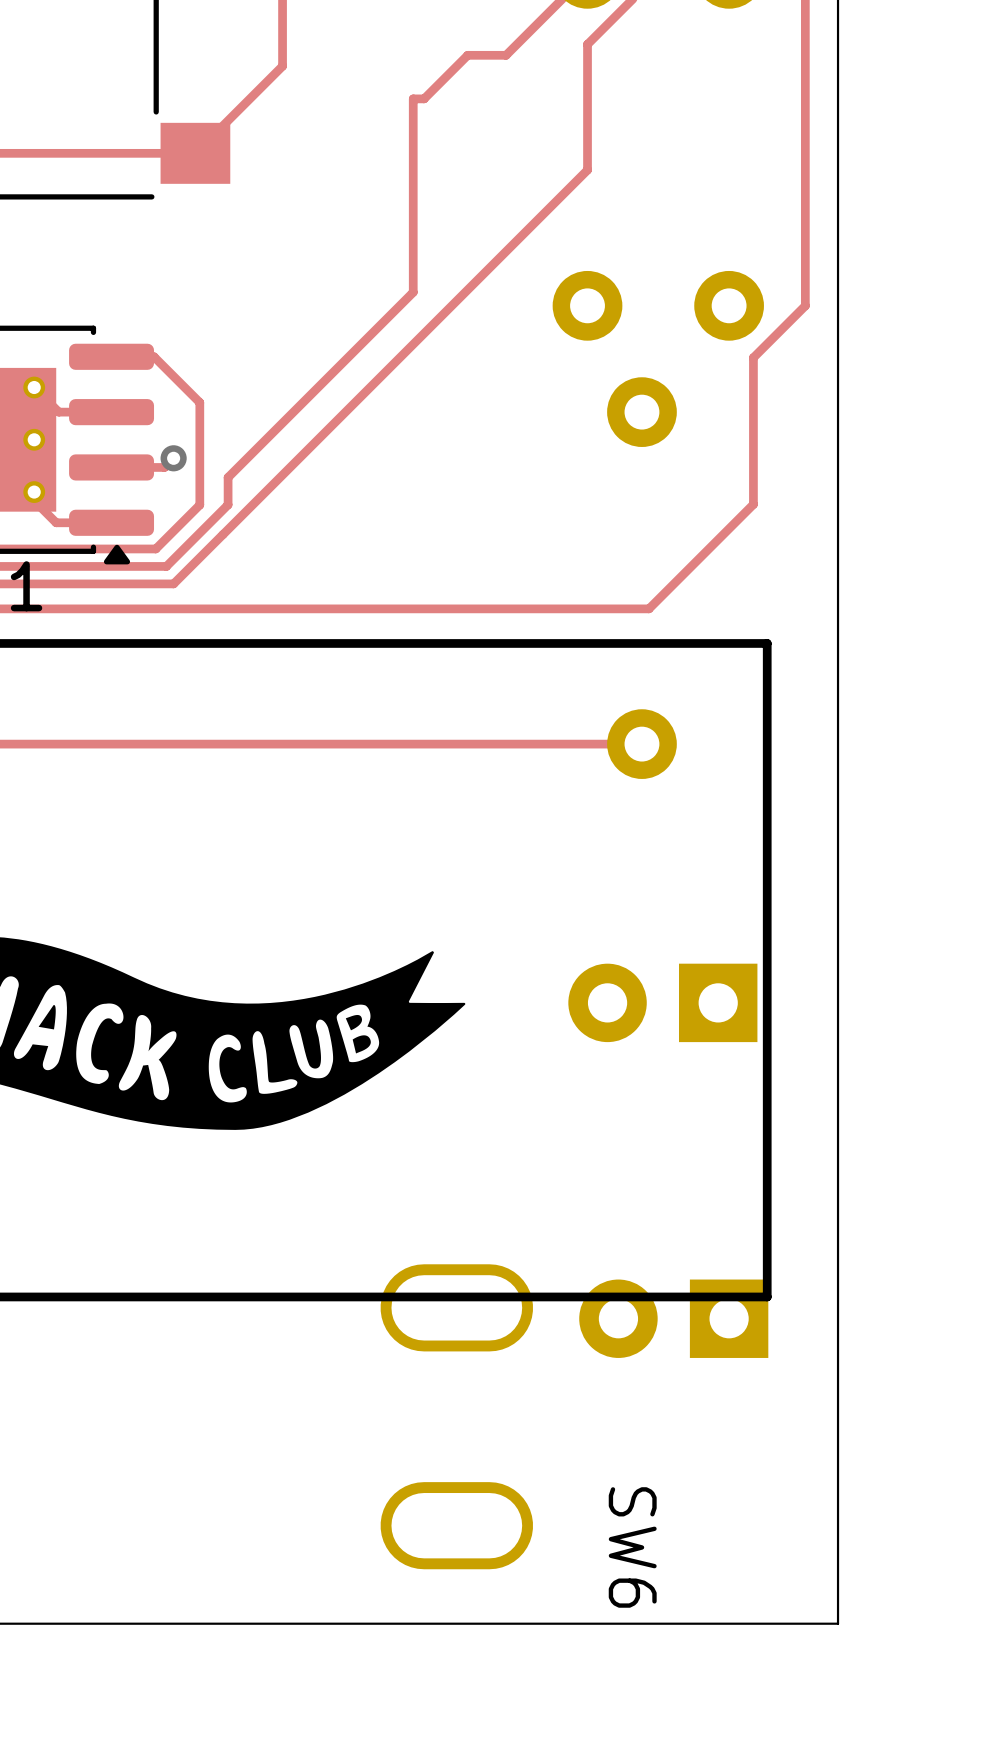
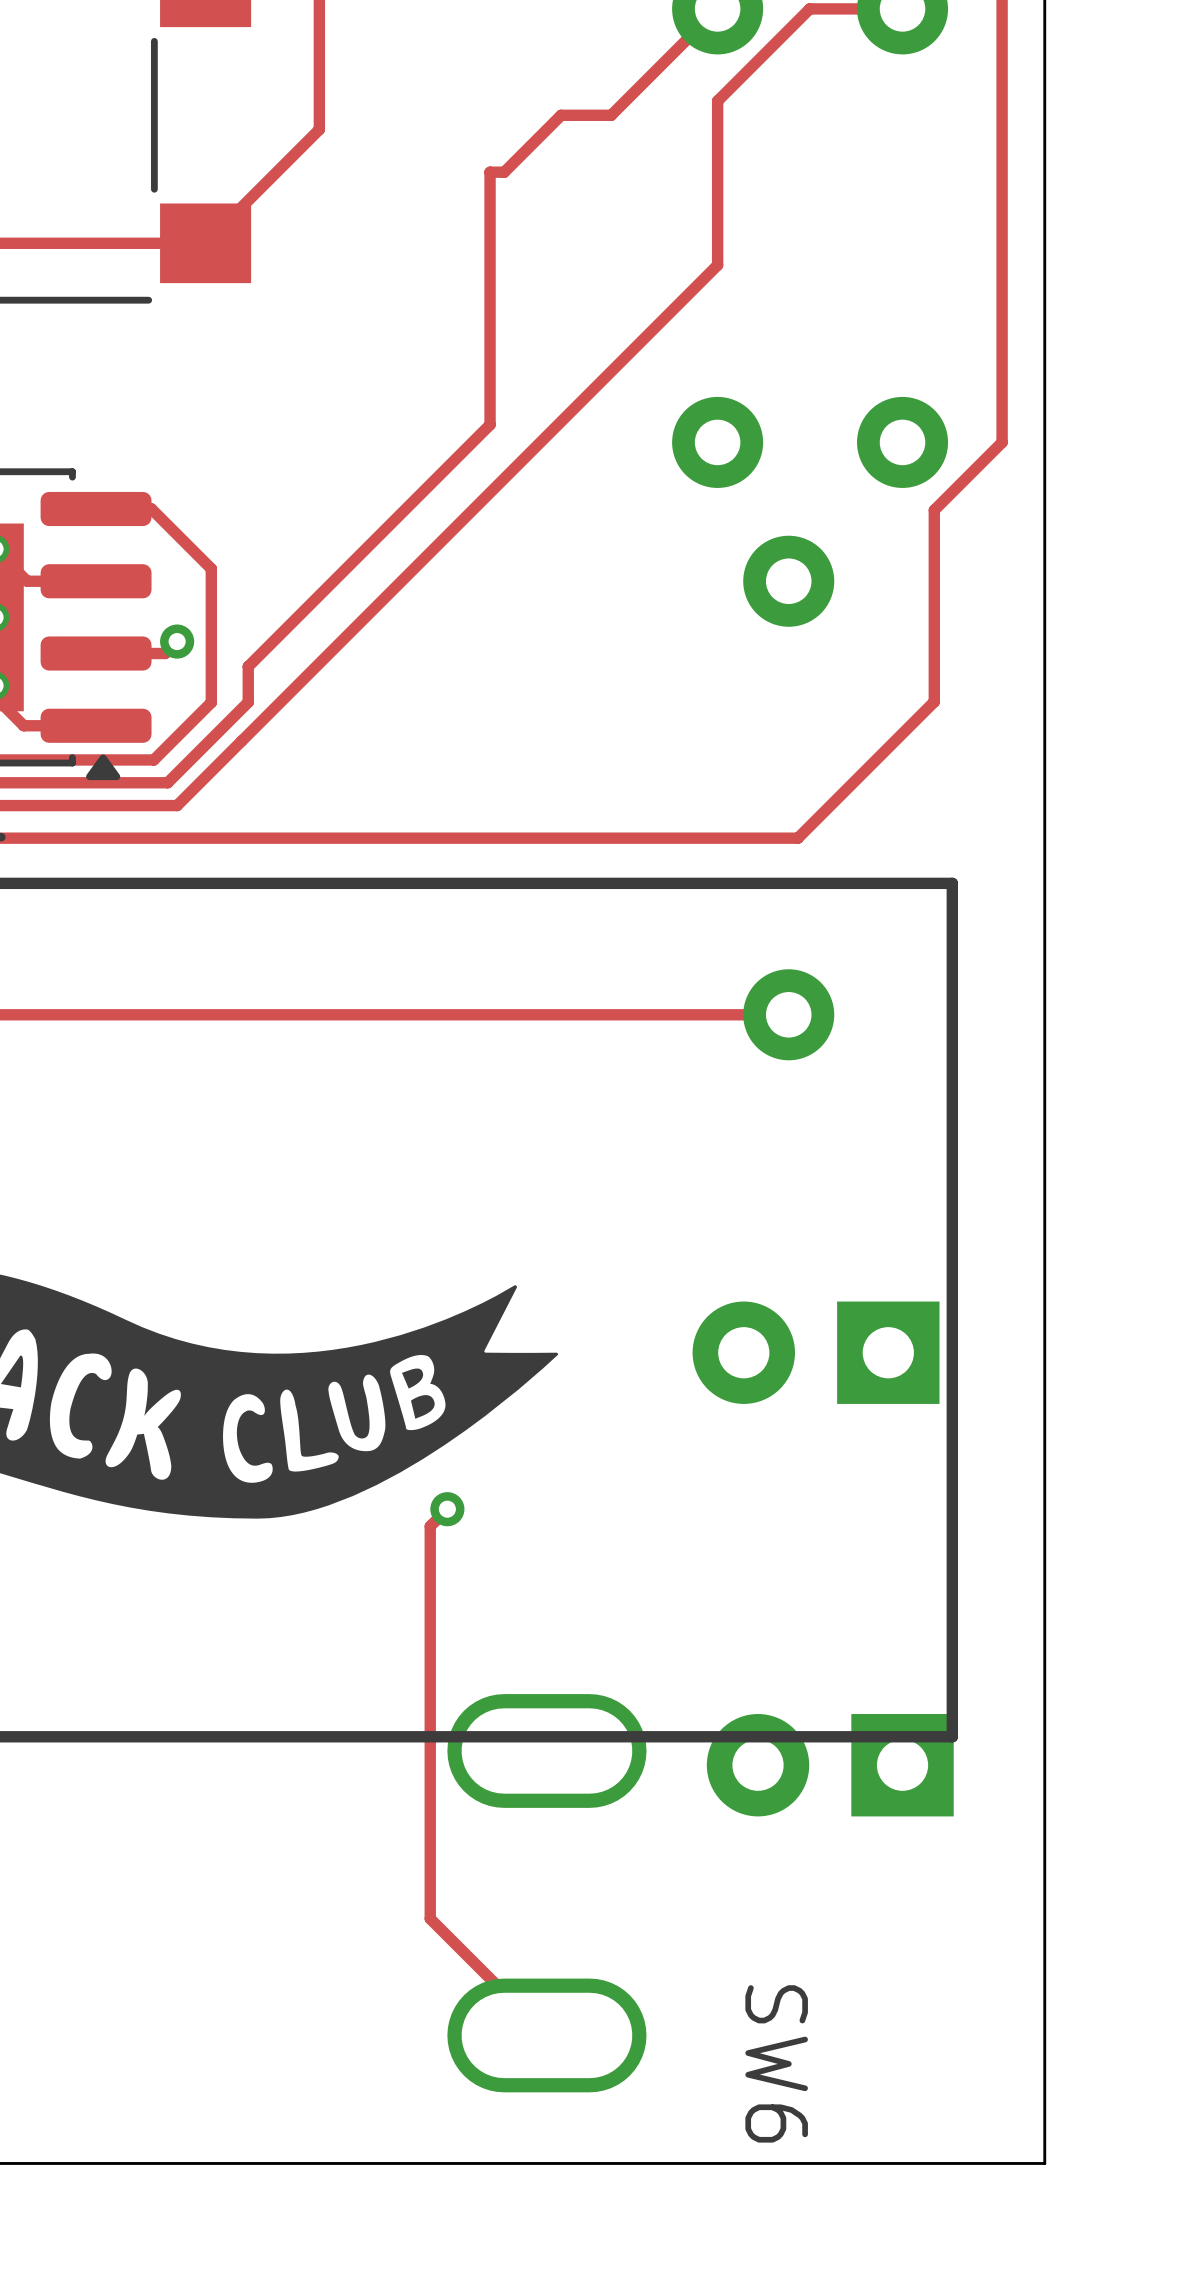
track: none -> (447, 1509) (430, 1526) (430, 1918) (546, 2035)
via: none -> (447, 1509)

